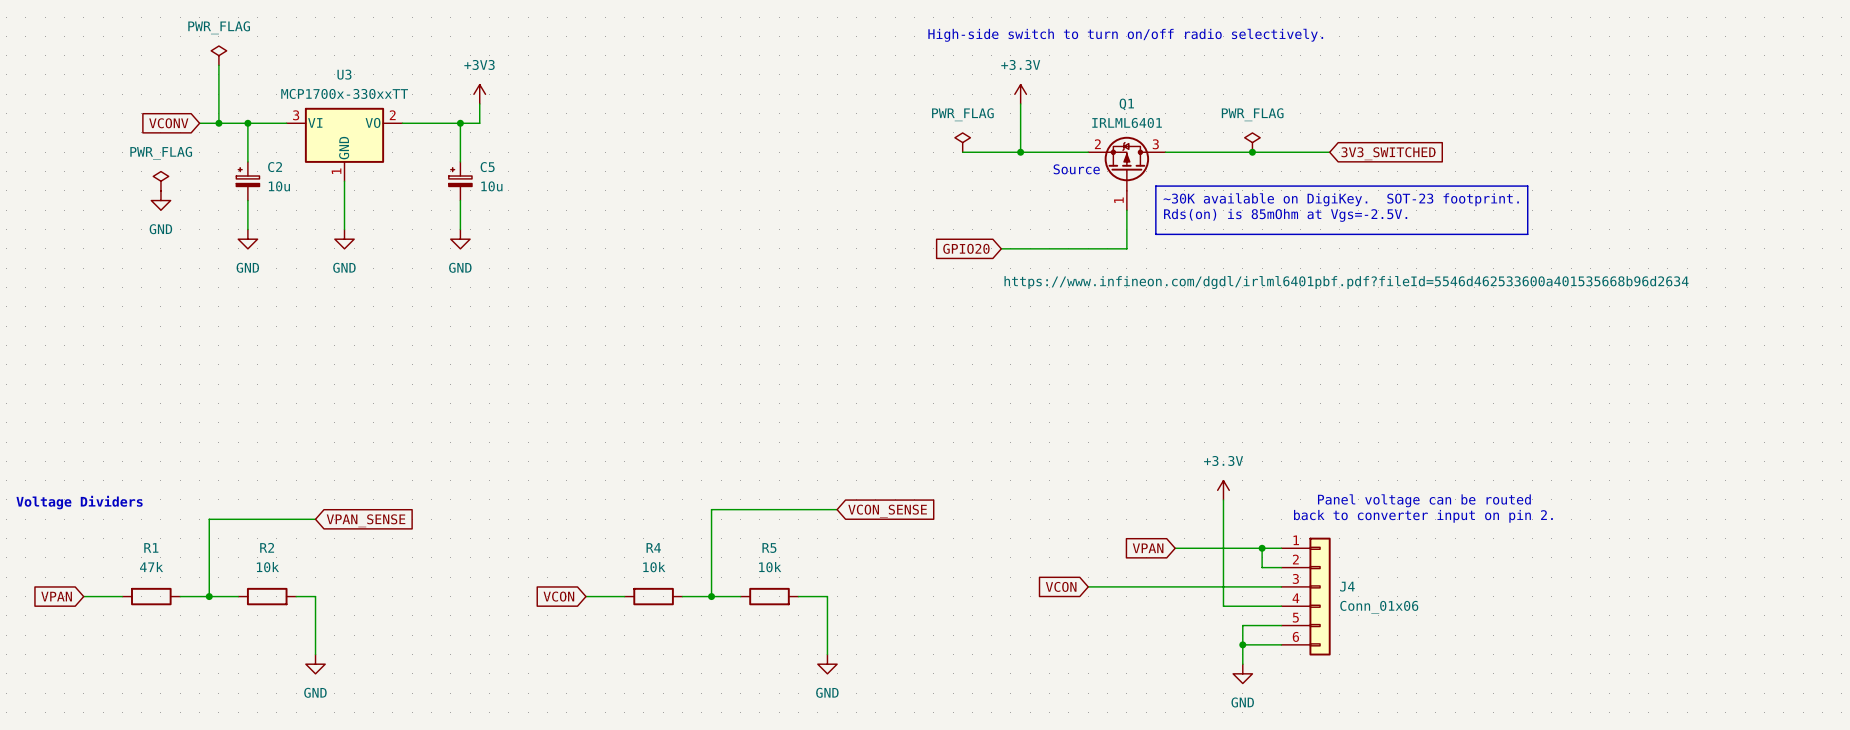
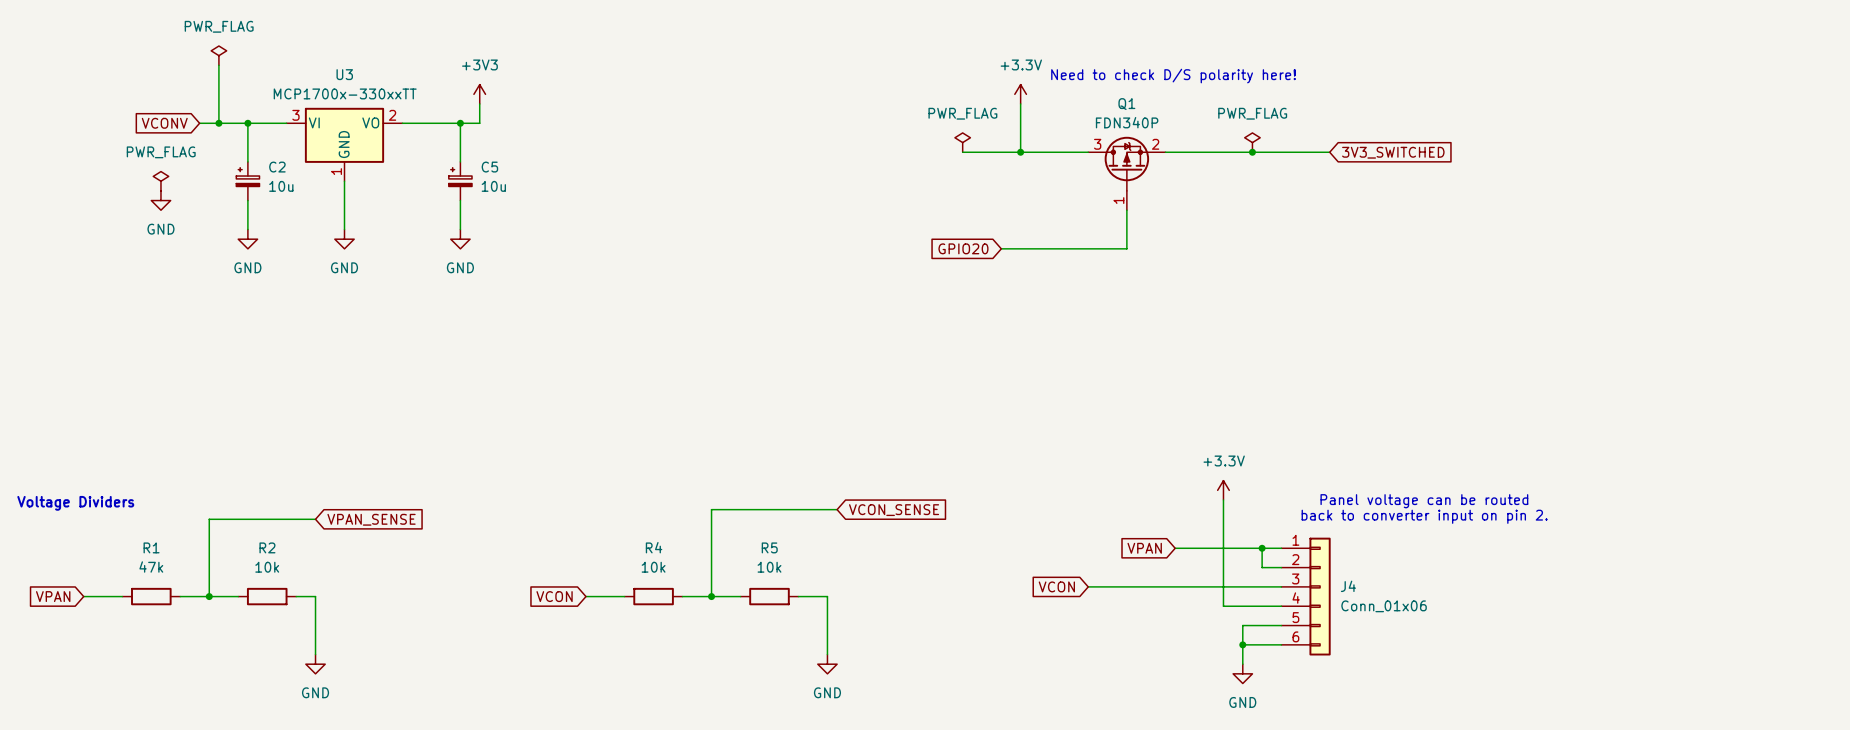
text: High-side switch to turn on/off radio selectively. (1125, 35) -> none
text: none -> Need to check D/S polarity here! (1173, 76)
Q1 value: IRLML6401 (1127, 122) -> FDN340P (1127, 122)
Q1 flip: as is (1126, 163) -> left-right (1126, 163)
text: Source (1076, 169) -> none
line: (1155, 186) (1527, 186) (1527, 234) (1155, 234) (1155, 186) -> none
text: ~30K available on DigiKey. SOT-23 footprint. (1341, 199) -> none
text: Rds(on) is 85mOhm at Vgs=-2.5V. (1285, 215) -> none
Q1 text: https://www.infineon.com/dgdl/irlml6401pbf.pdf?fileId=5546d462533600a401535668b96d2634 (1346, 282) -> none

